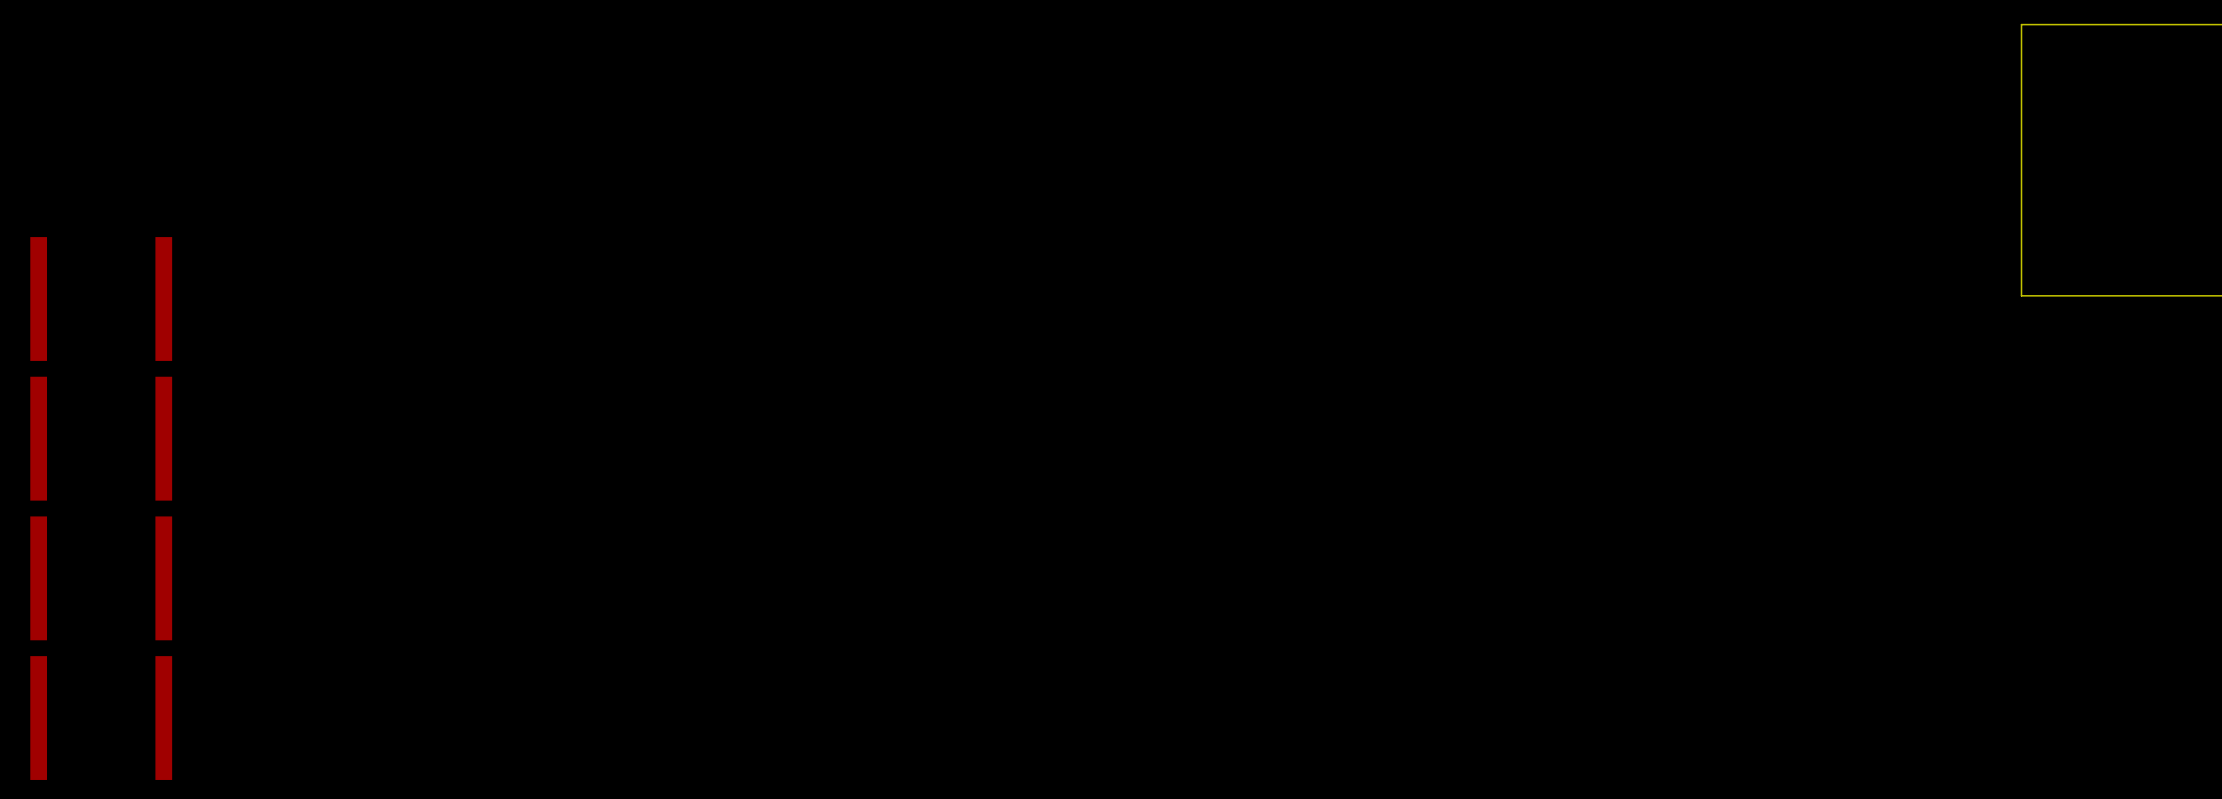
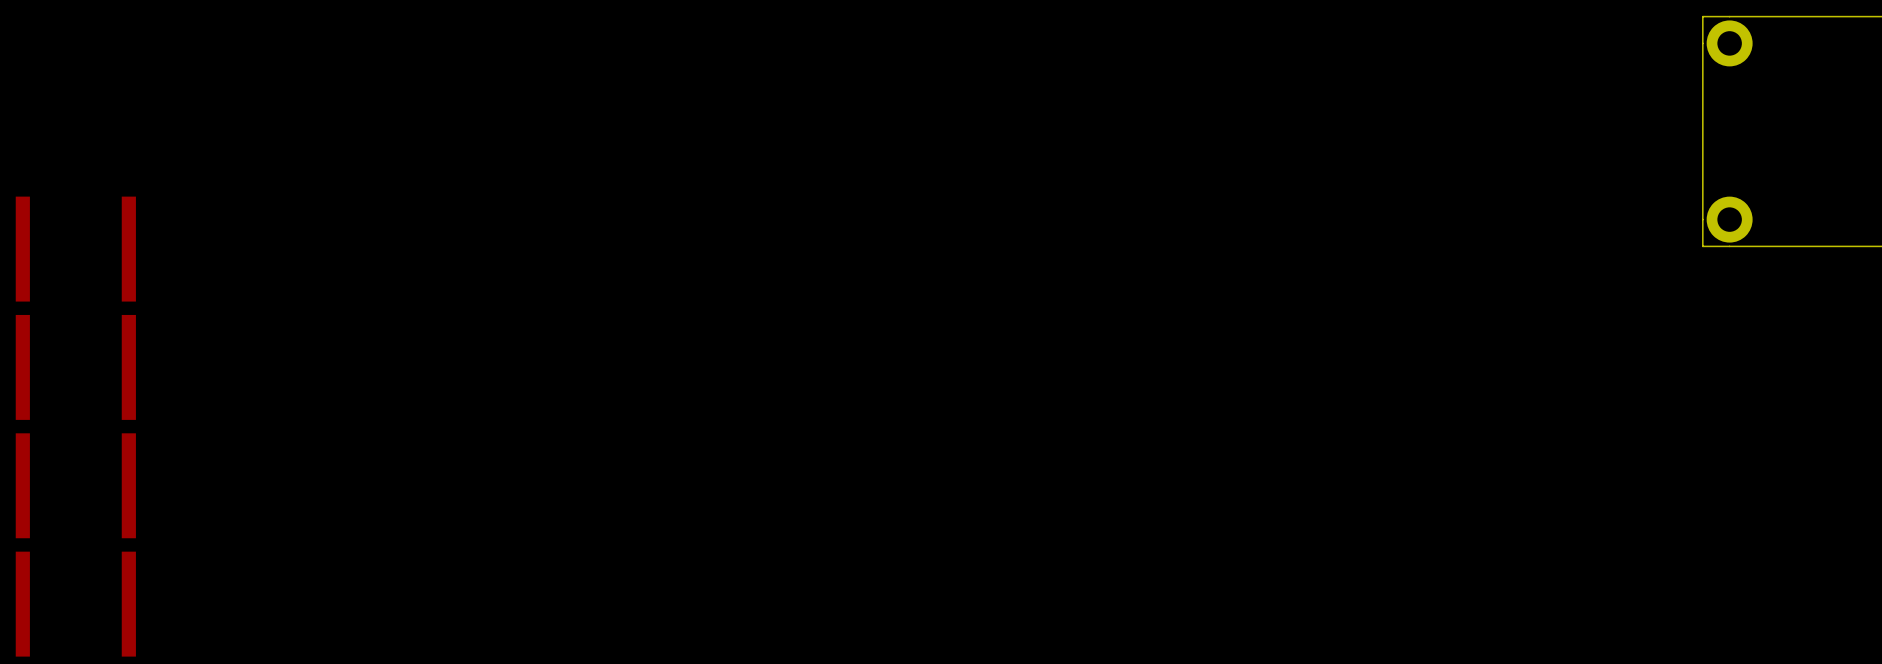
part: none -> (1729, 43)
part: none -> (1729, 219)

